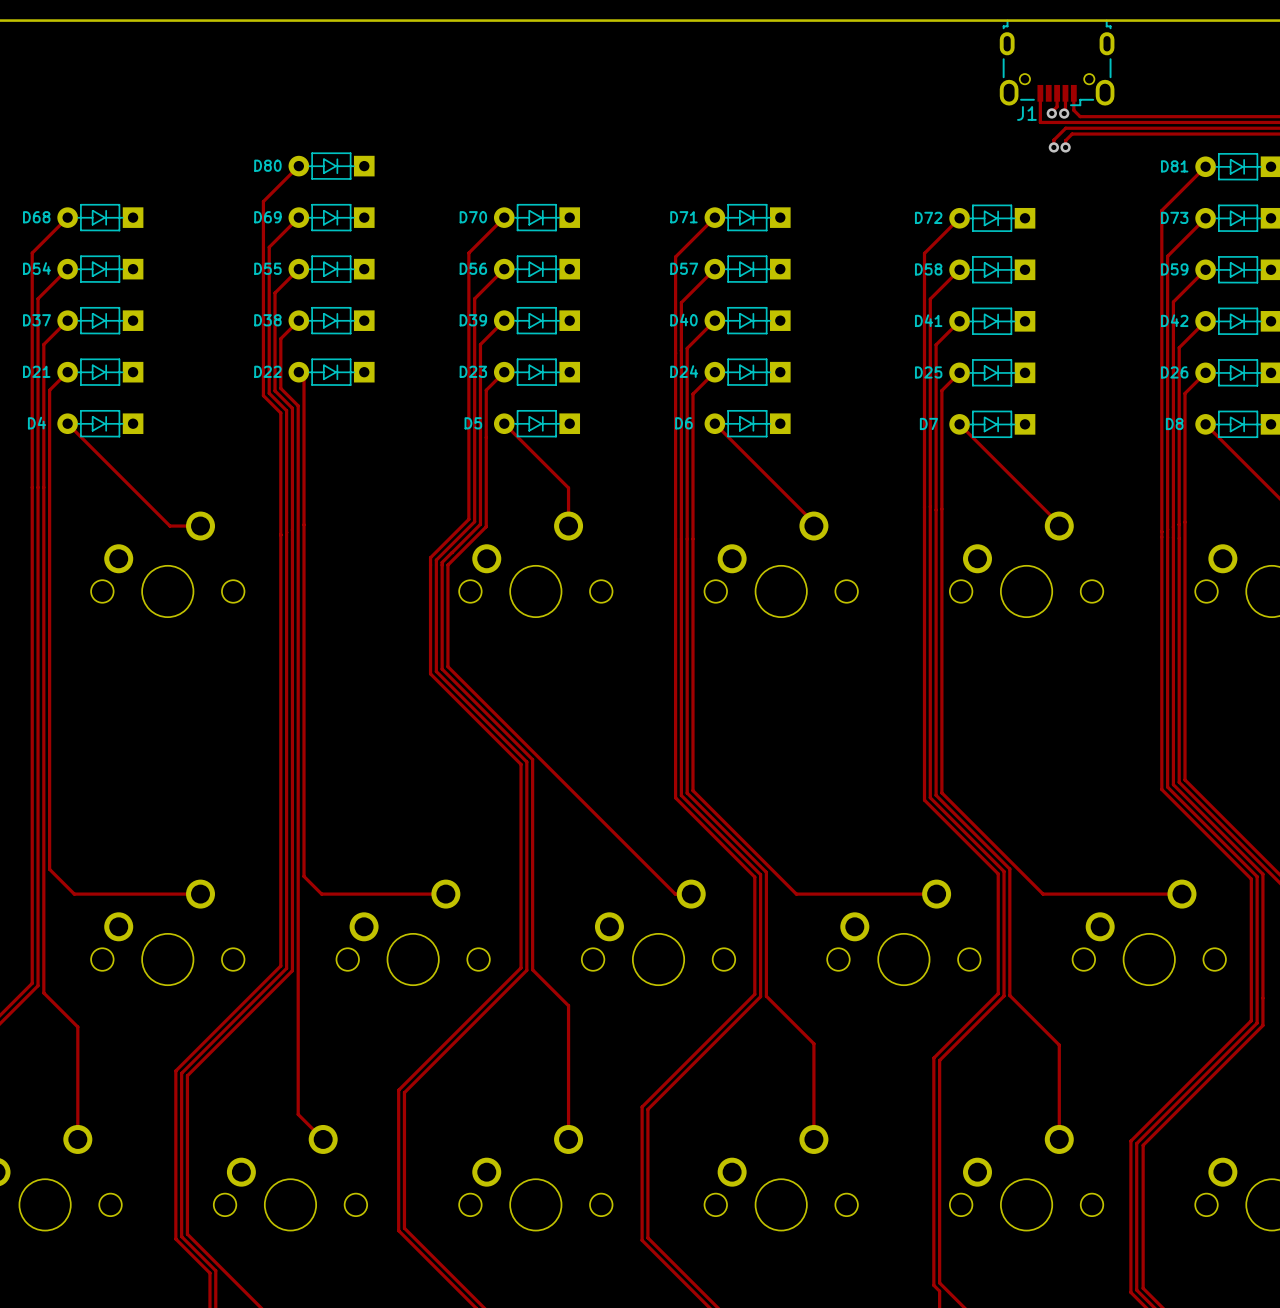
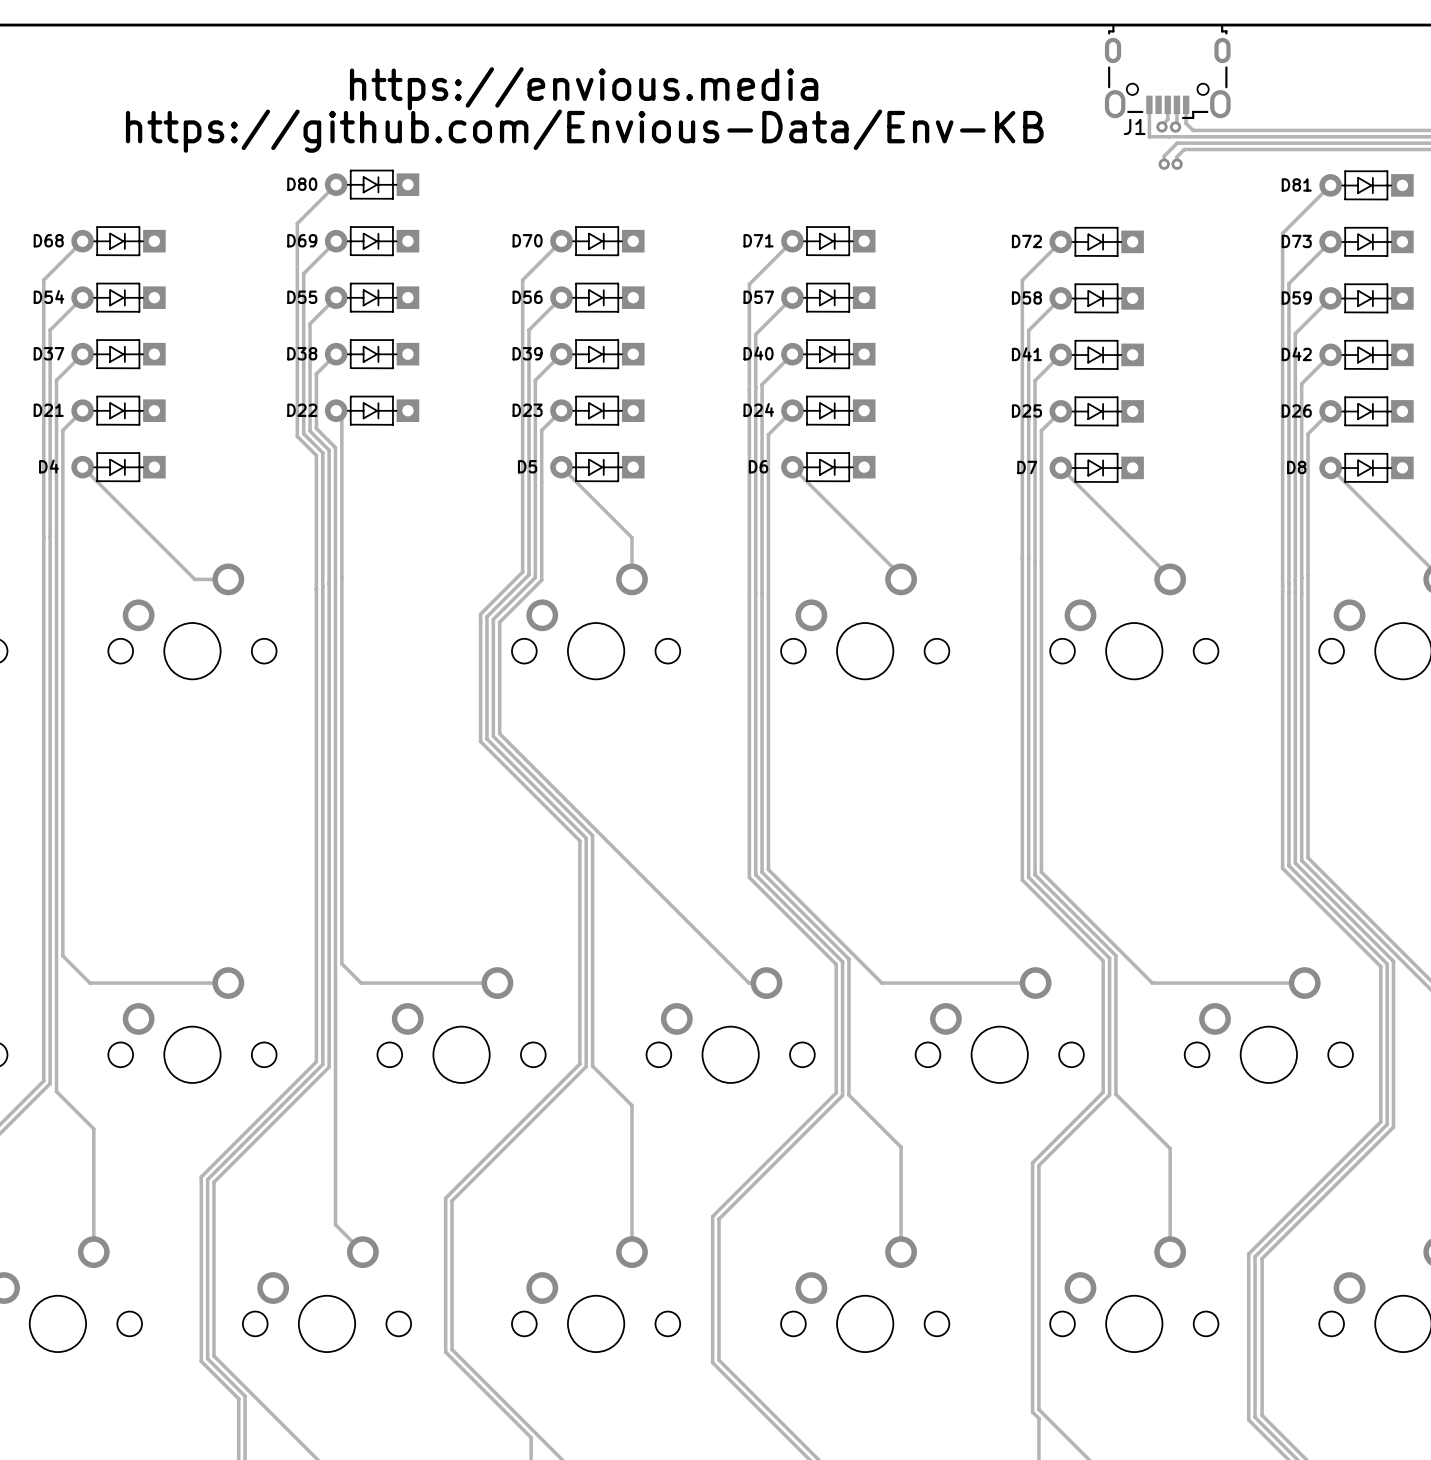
text: none -> https://envious.media (584, 88)
text: none -> https://github.com/Envious-Data/Env-KB (584, 131)

